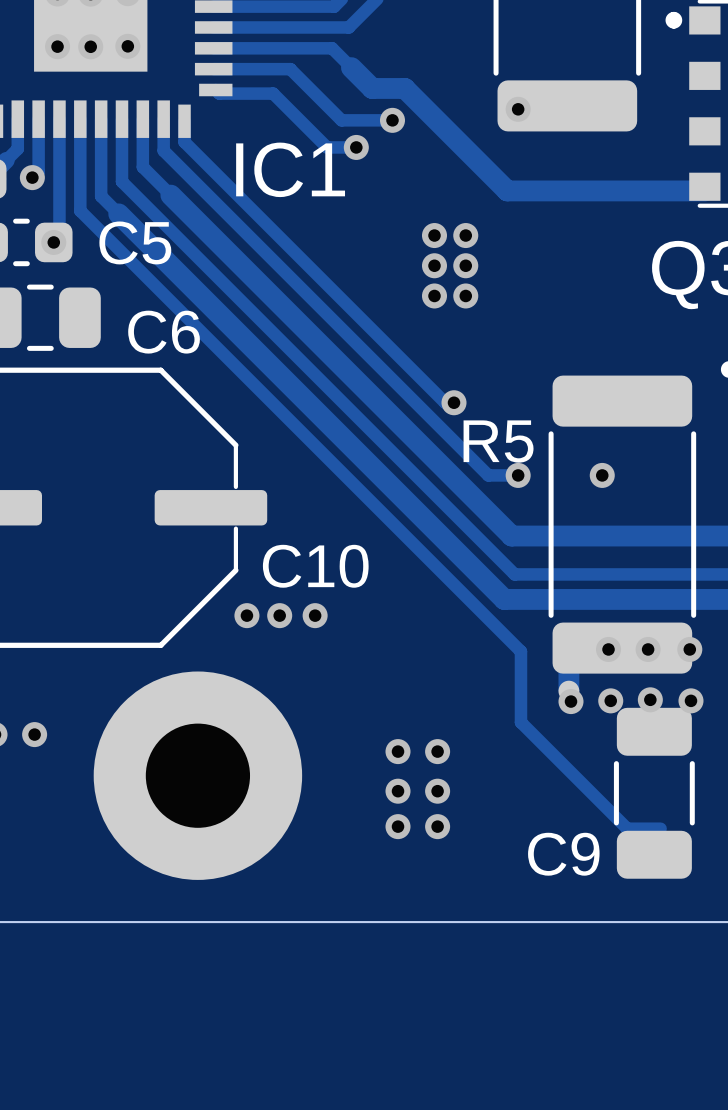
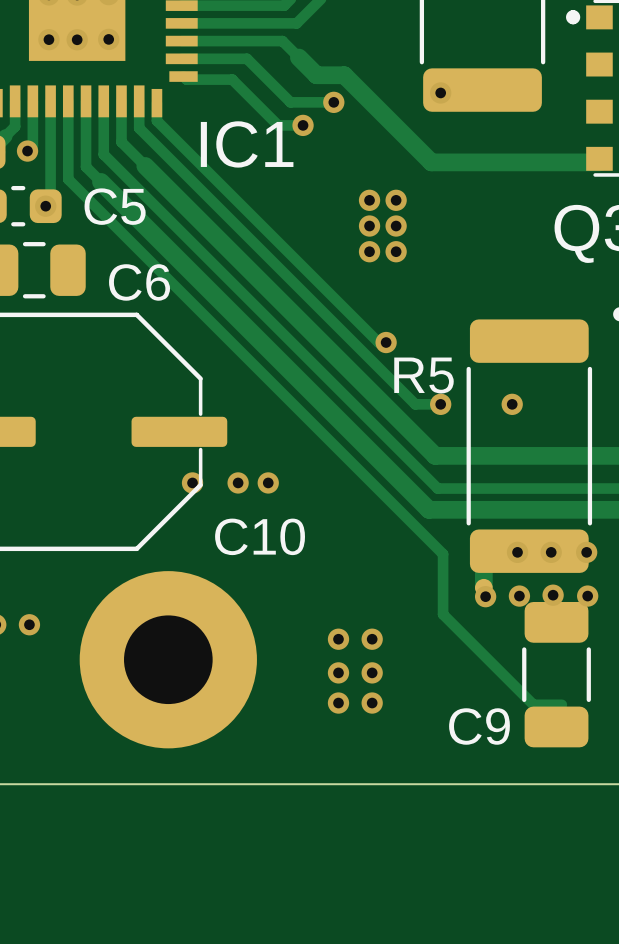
C10 name position: C10 (315, 566) -> C10 (260, 536)
via: none -> (192, 482)
via: none -> (238, 482)
via: none -> (268, 482)
via: (246, 615) -> none
via: (279, 615) -> none
via: (315, 615) -> none

